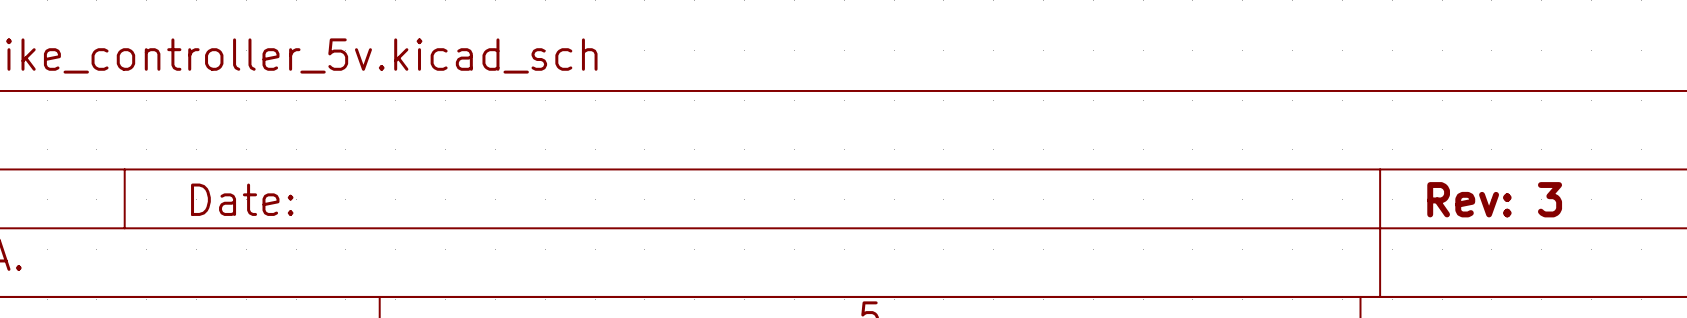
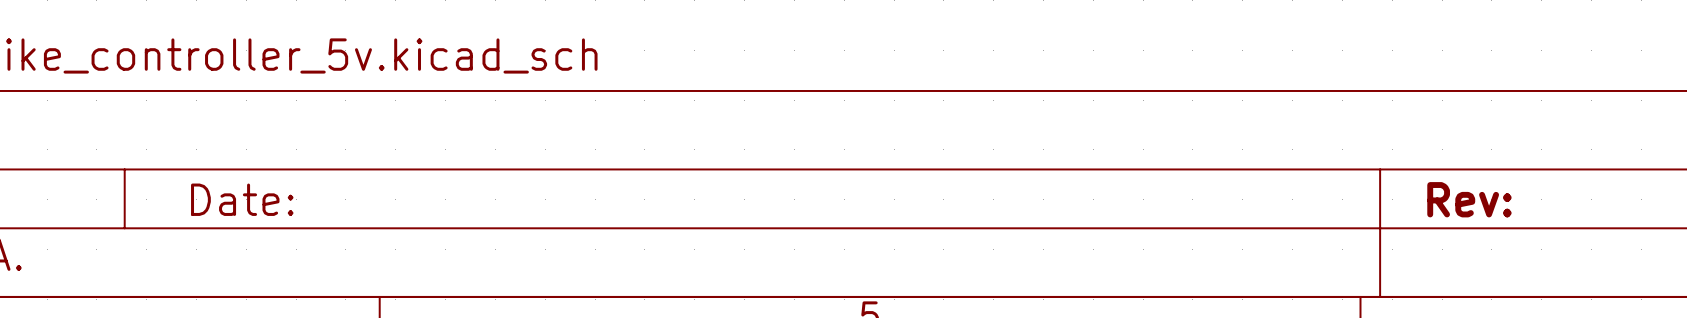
title block: Rev: 3 (1494, 199) -> Rev: (1469, 199)

